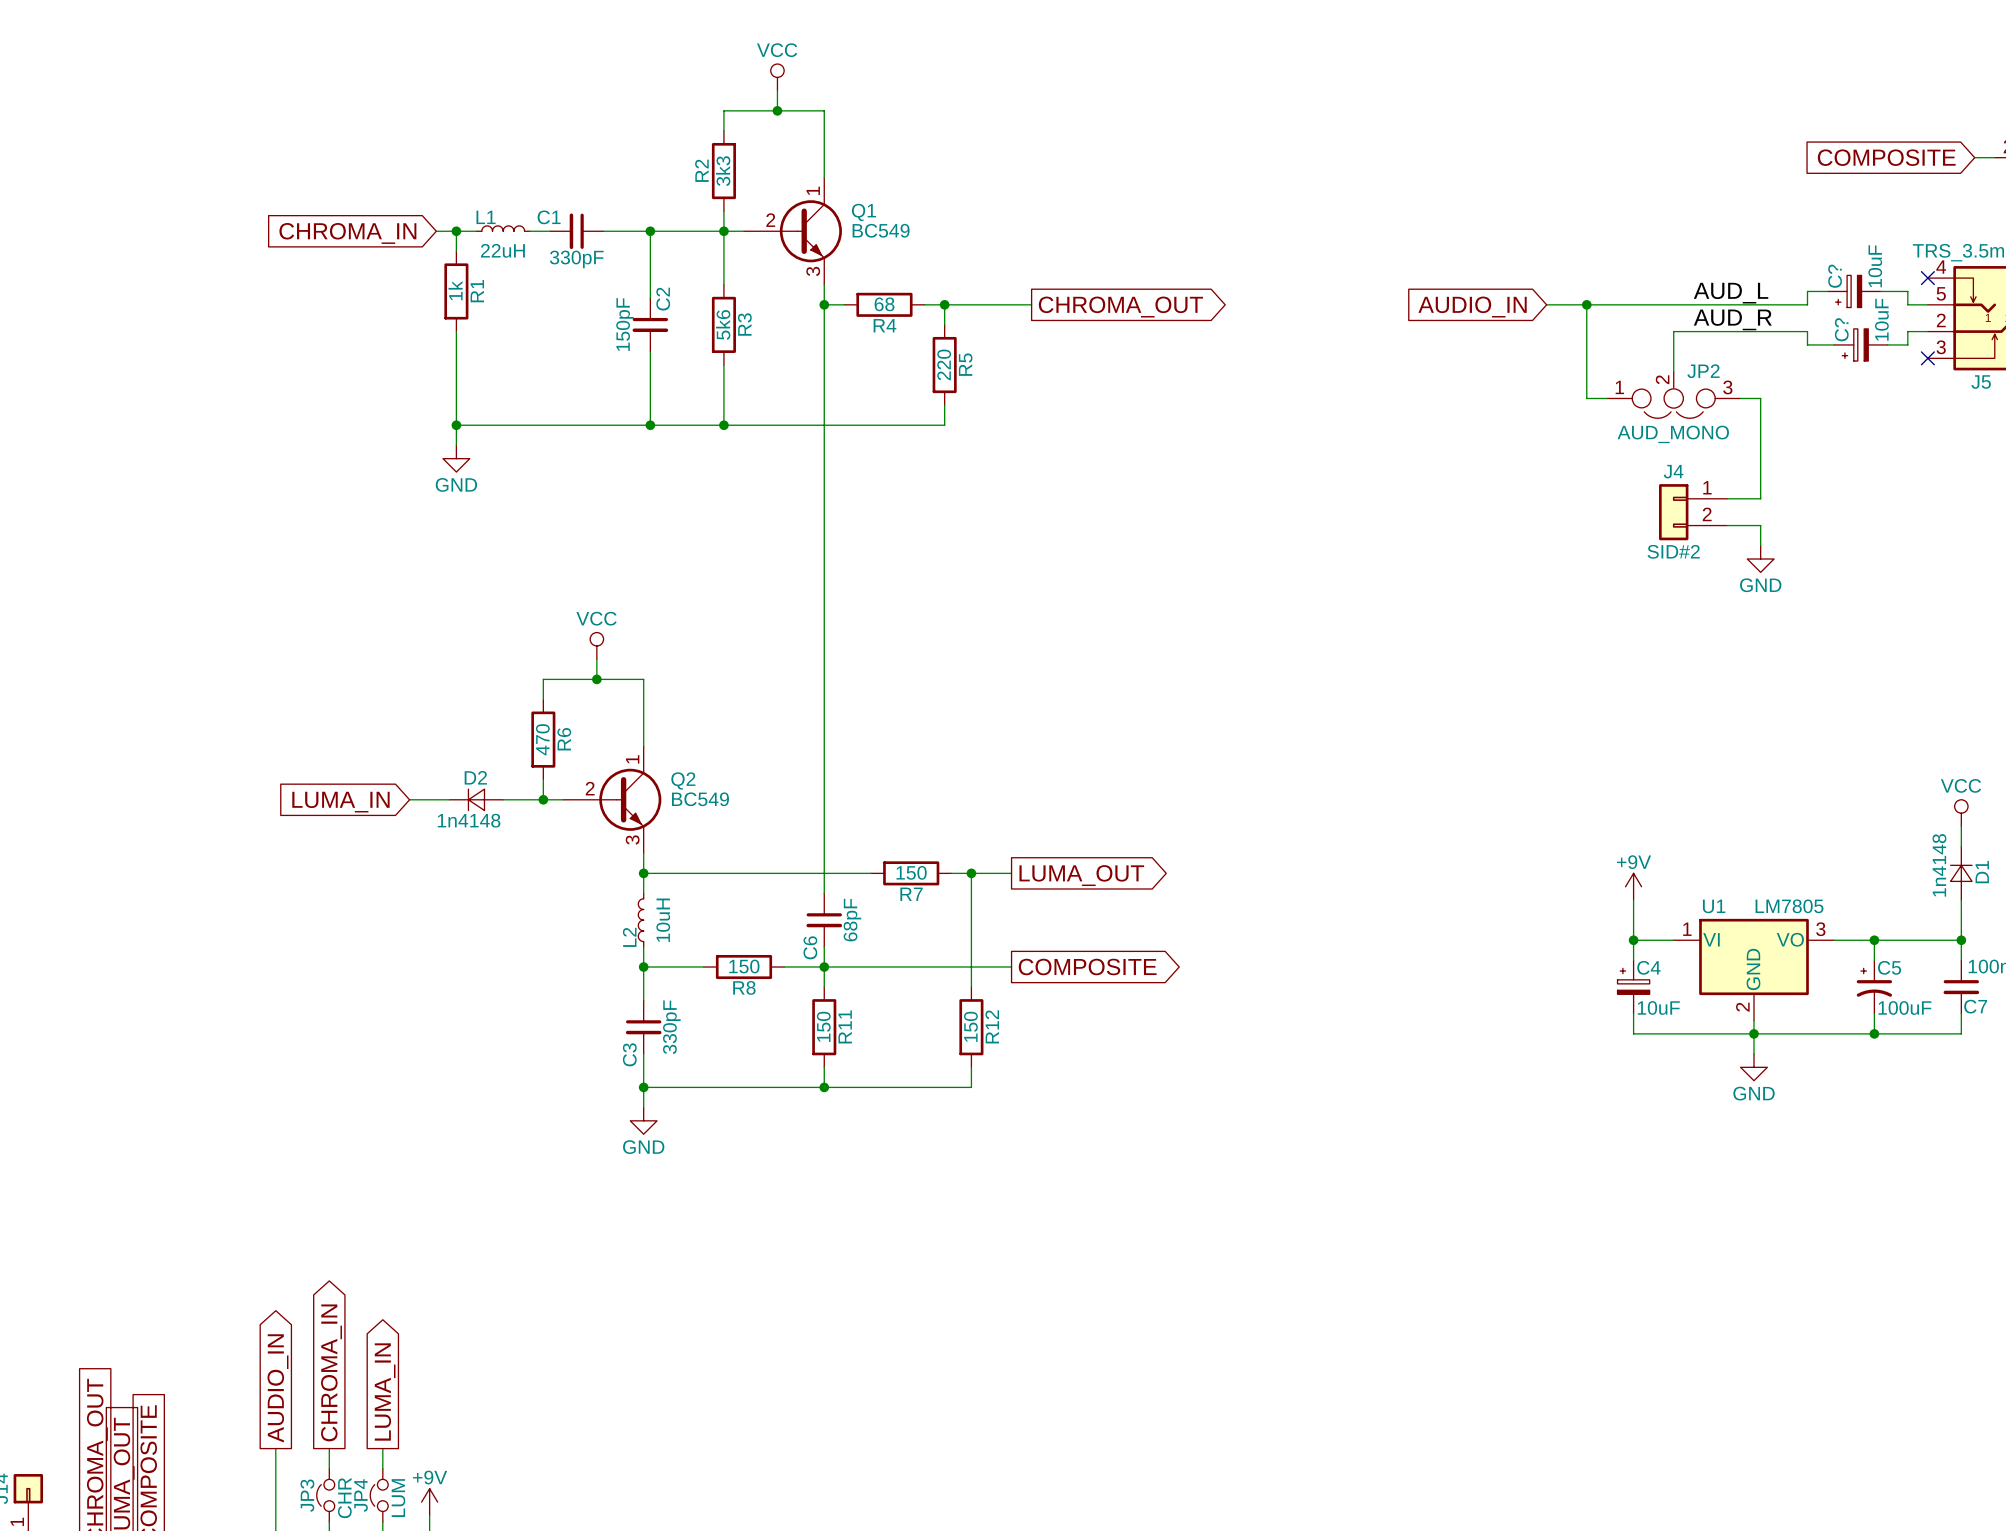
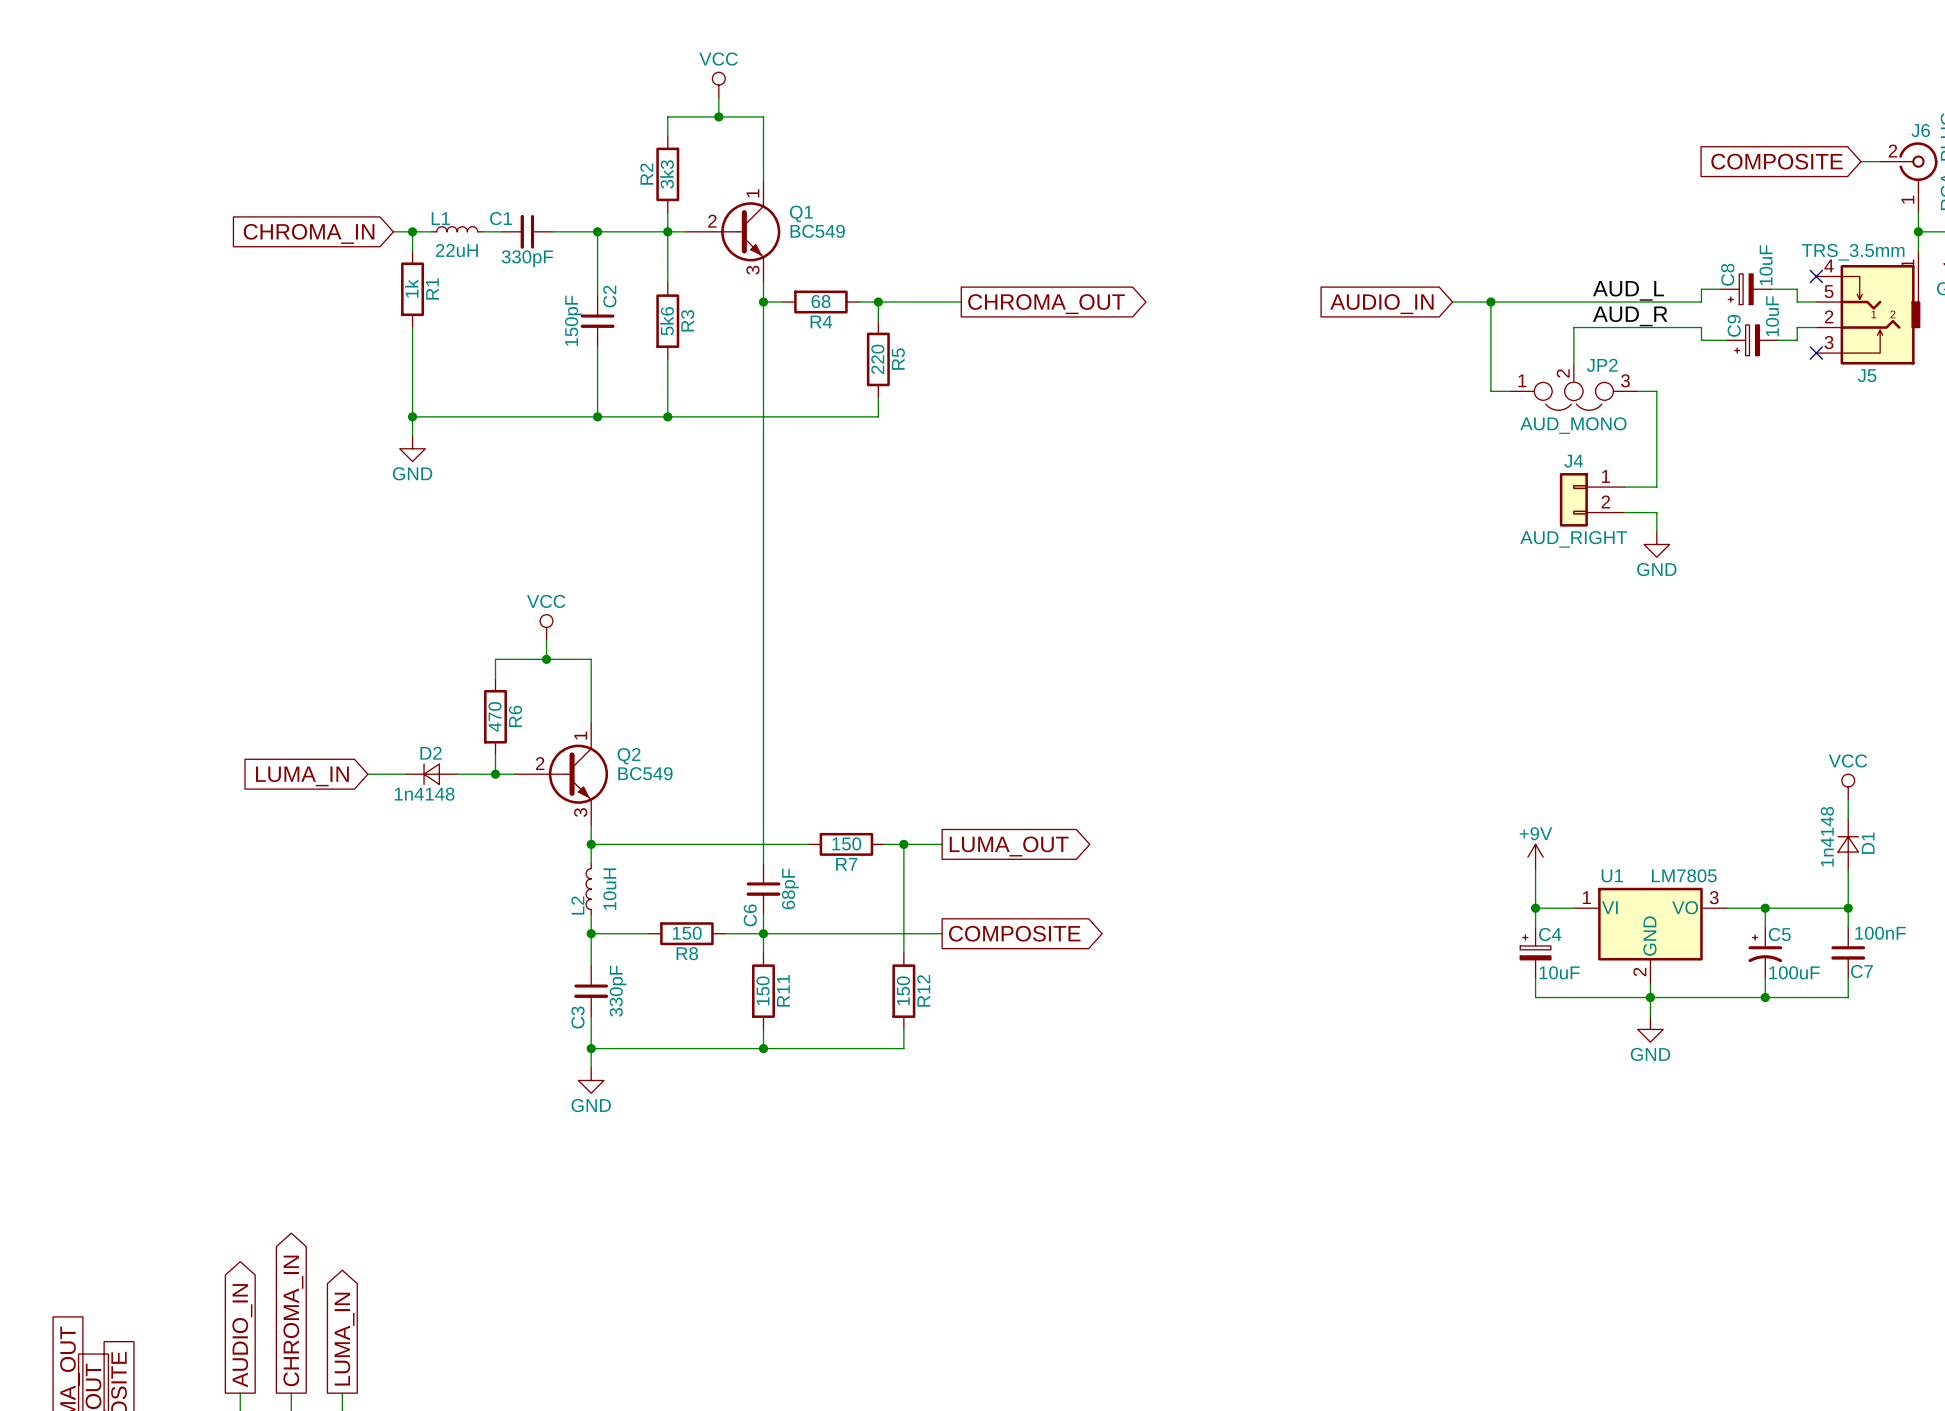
C? name: C? (1835, 276) -> C8 (1727, 274)
C? name: C? (1841, 329) -> C9 (1734, 325)
J4 value: SID#2 (1673, 551) -> AUD_RIGHT (1573, 539)

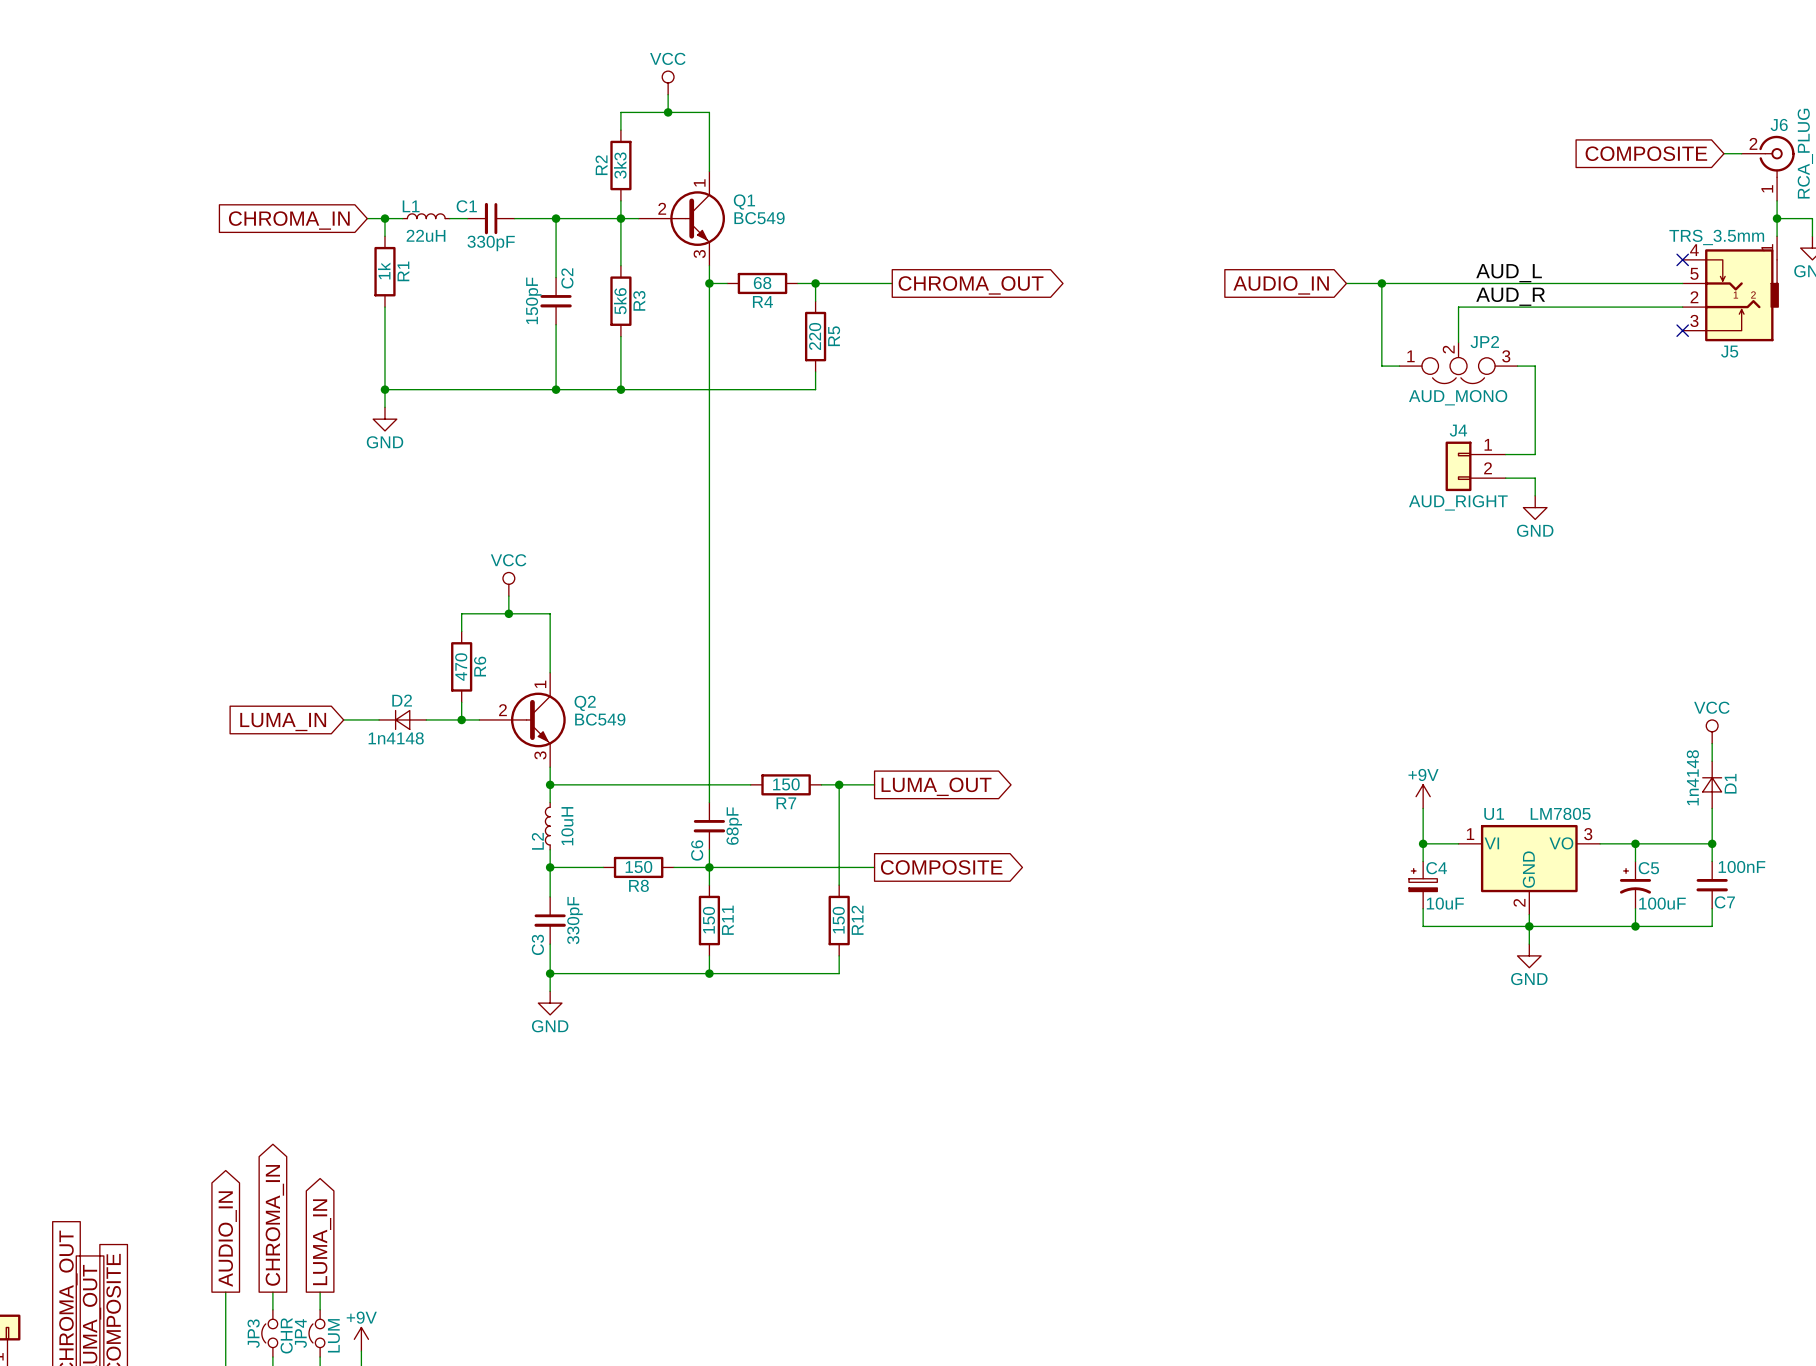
wire: (1720, 289) (1701, 289) (1701, 302) -> none
C8: 10uF (1746, 289) -> none
wire: (1771, 289) (1797, 289) (1797, 302) -> (1576, 283) (1664, 283)
wire: (1701, 327) (1701, 340) (1727, 340) -> (1576, 307) (1664, 307)
wire: (1797, 327) (1797, 340) (1778, 340) -> none
C9: 10uF (1752, 340) -> none

